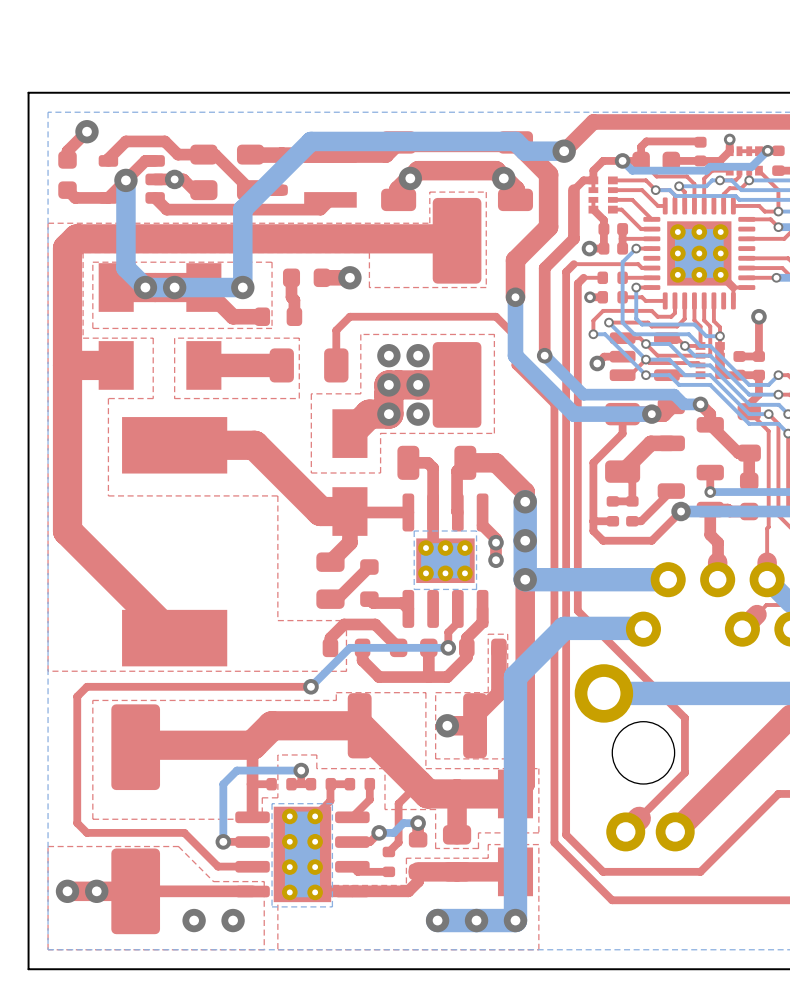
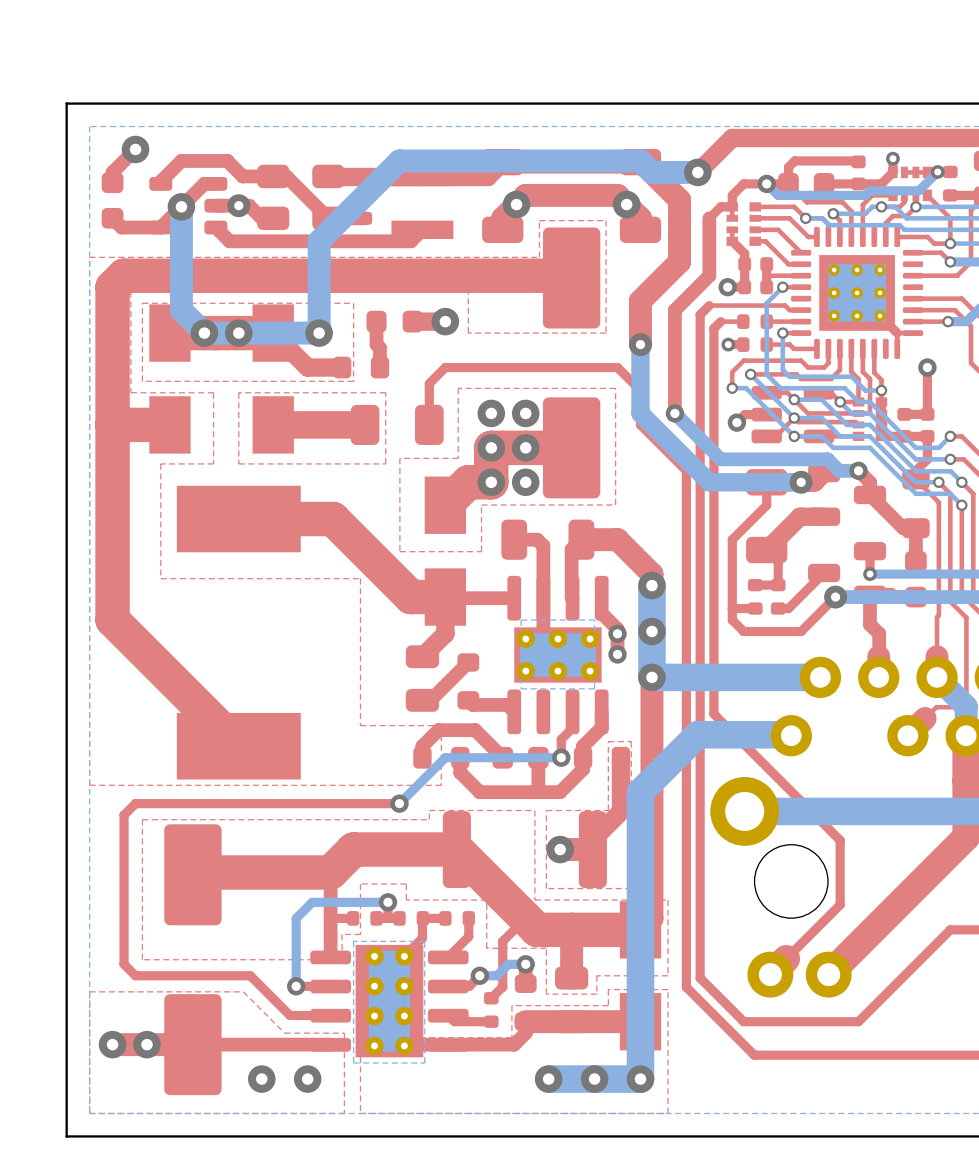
part footprint: [643, 197, 756, 310] -> [791, 226, 924, 359]
part footprint: [402, 493, 489, 628] -> [507, 575, 609, 735]

